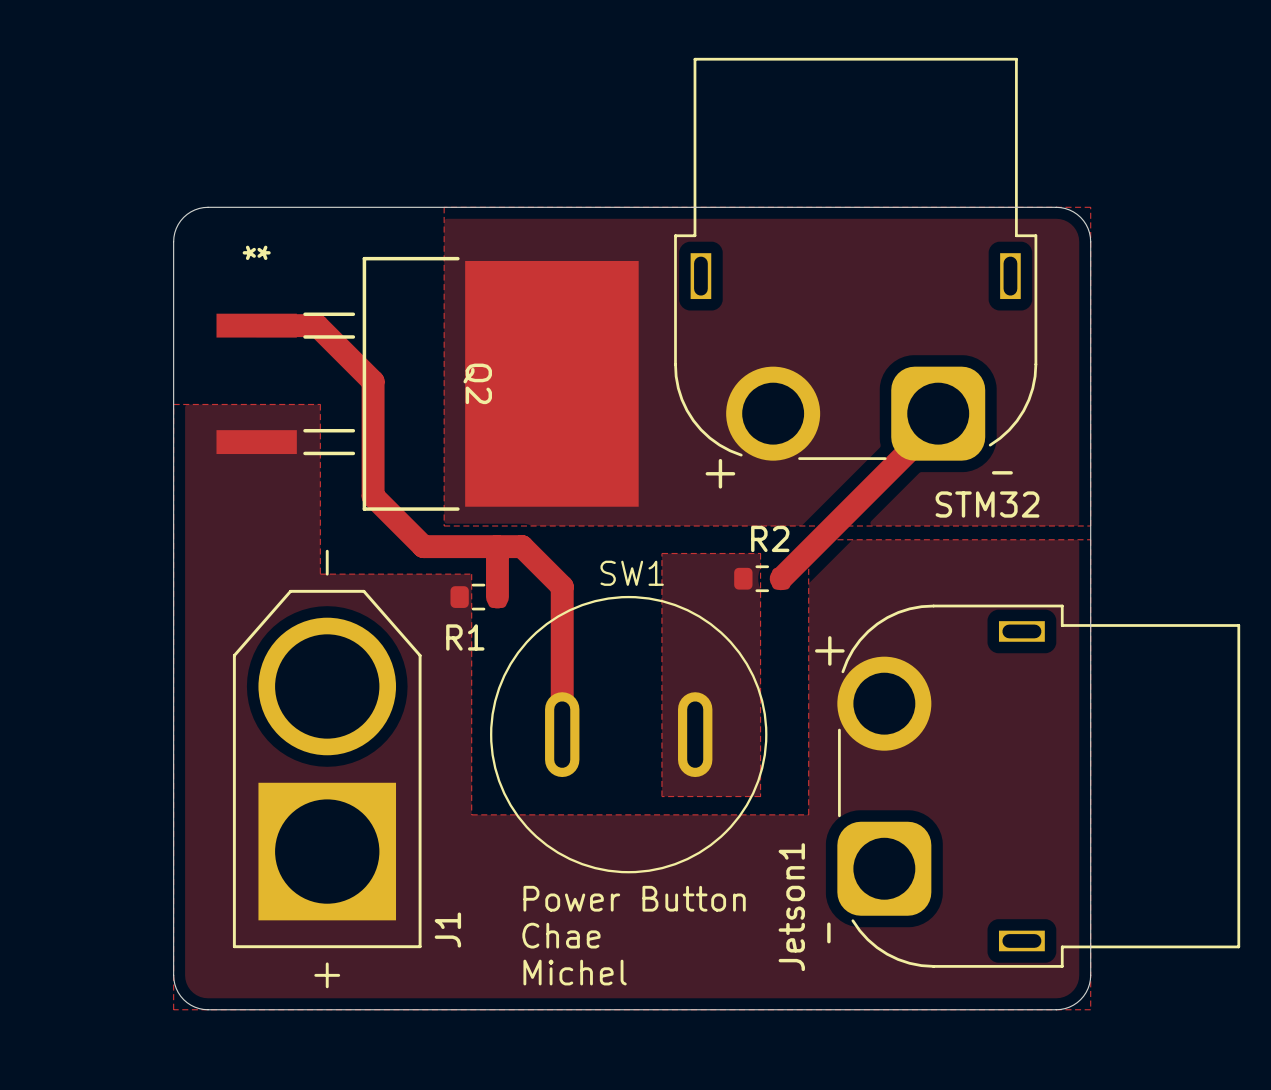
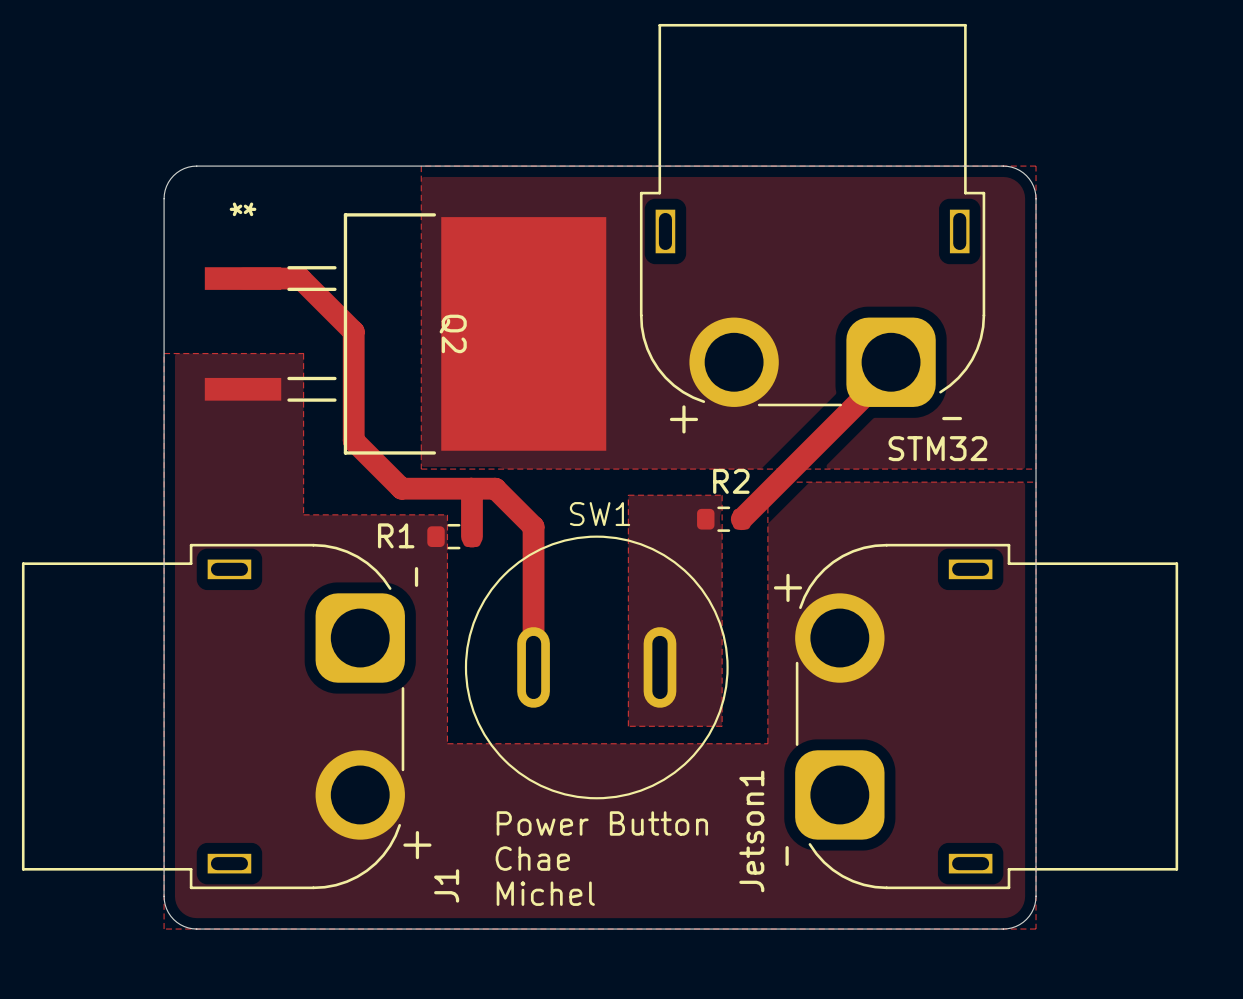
J1 footprint: [232, 549, 422, 989] -> [21, 543, 405, 890]
R1 name position: R1 (465, 637) -> R1 (396, 535)
J1 name position: J1 (447, 930) -> J1 (446, 885)

